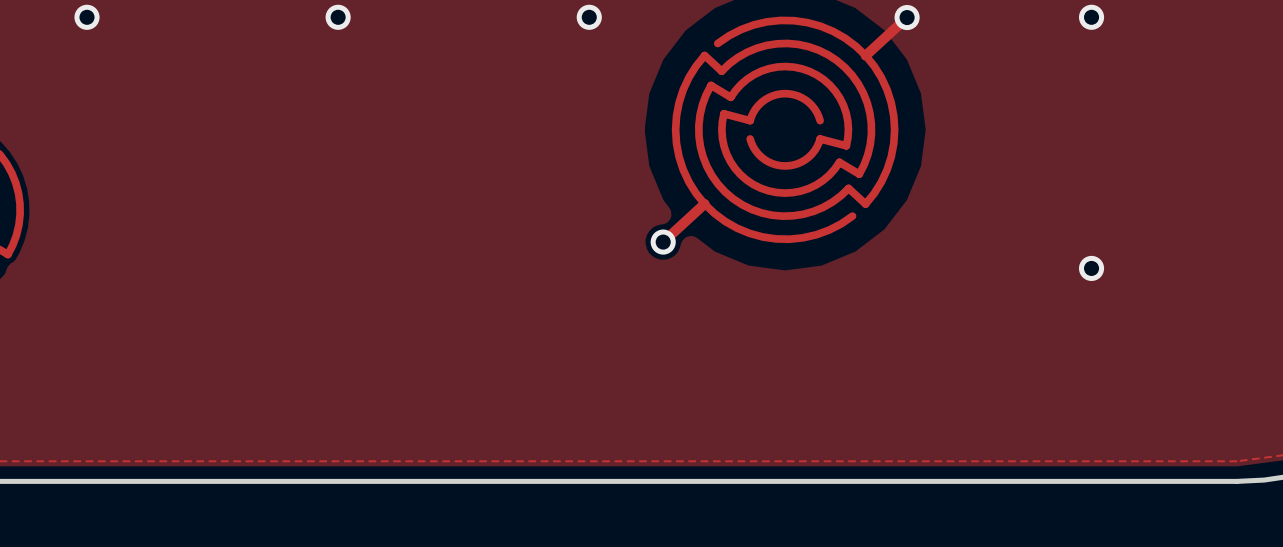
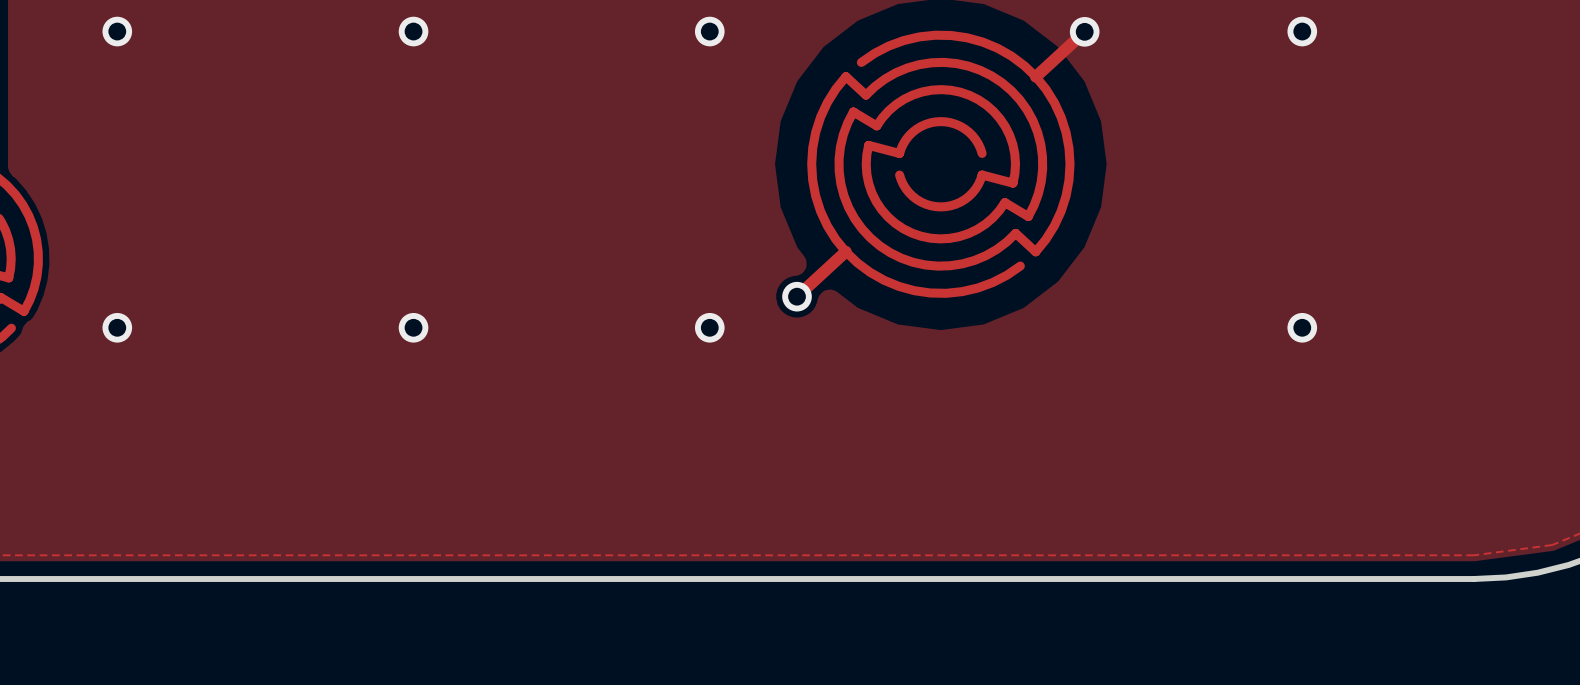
via: none -> (117, 327)
via: none -> (413, 327)
via: none -> (709, 327)

